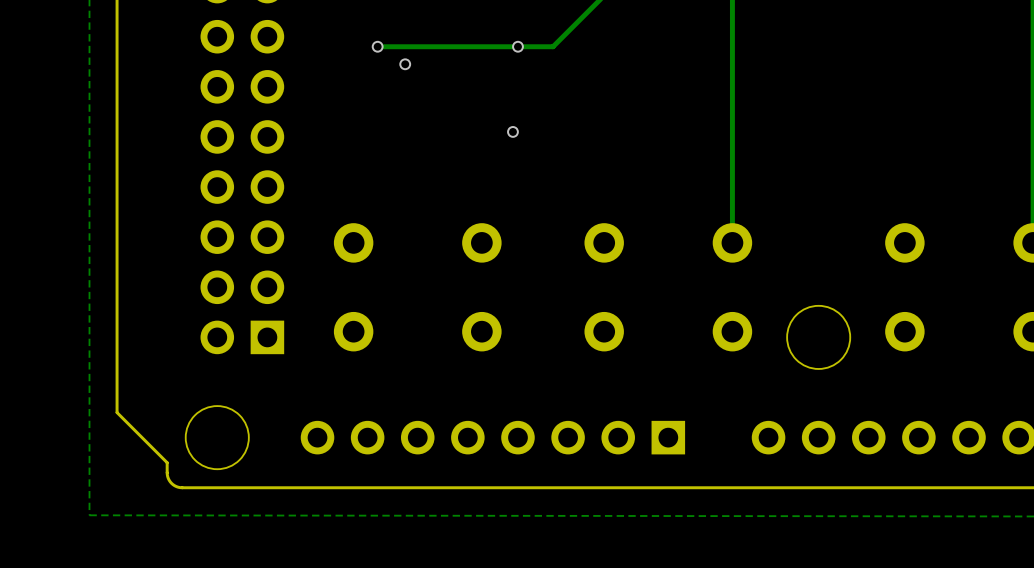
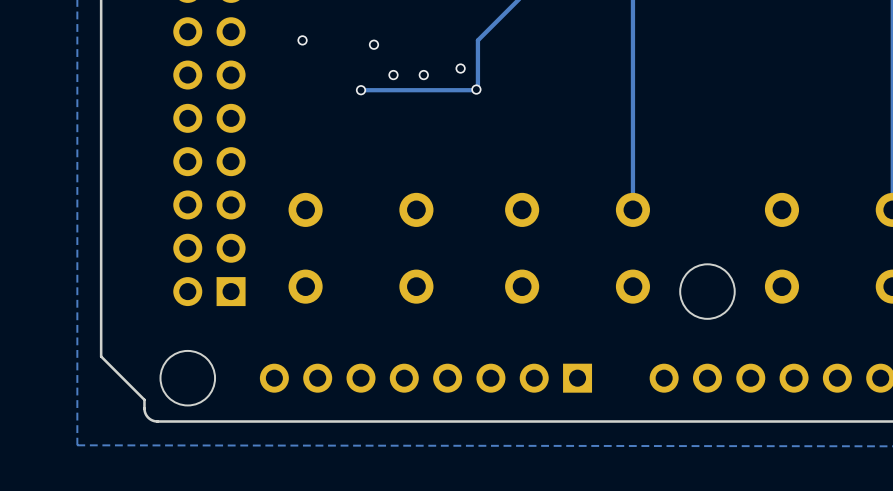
via: none -> (302, 40)
via: (377, 46) -> none
via: (517, 46) -> none
track: (553, 46) (377, 46) -> (477, 40) (477, 88) (475, 90) (361, 90)
via: none -> (373, 44)
via: (405, 64) -> none
via: none -> (460, 68)
via: none -> (393, 75)
via: none -> (423, 75)
via: none -> (476, 89)
via: none -> (361, 90)
via: (512, 131) -> none

